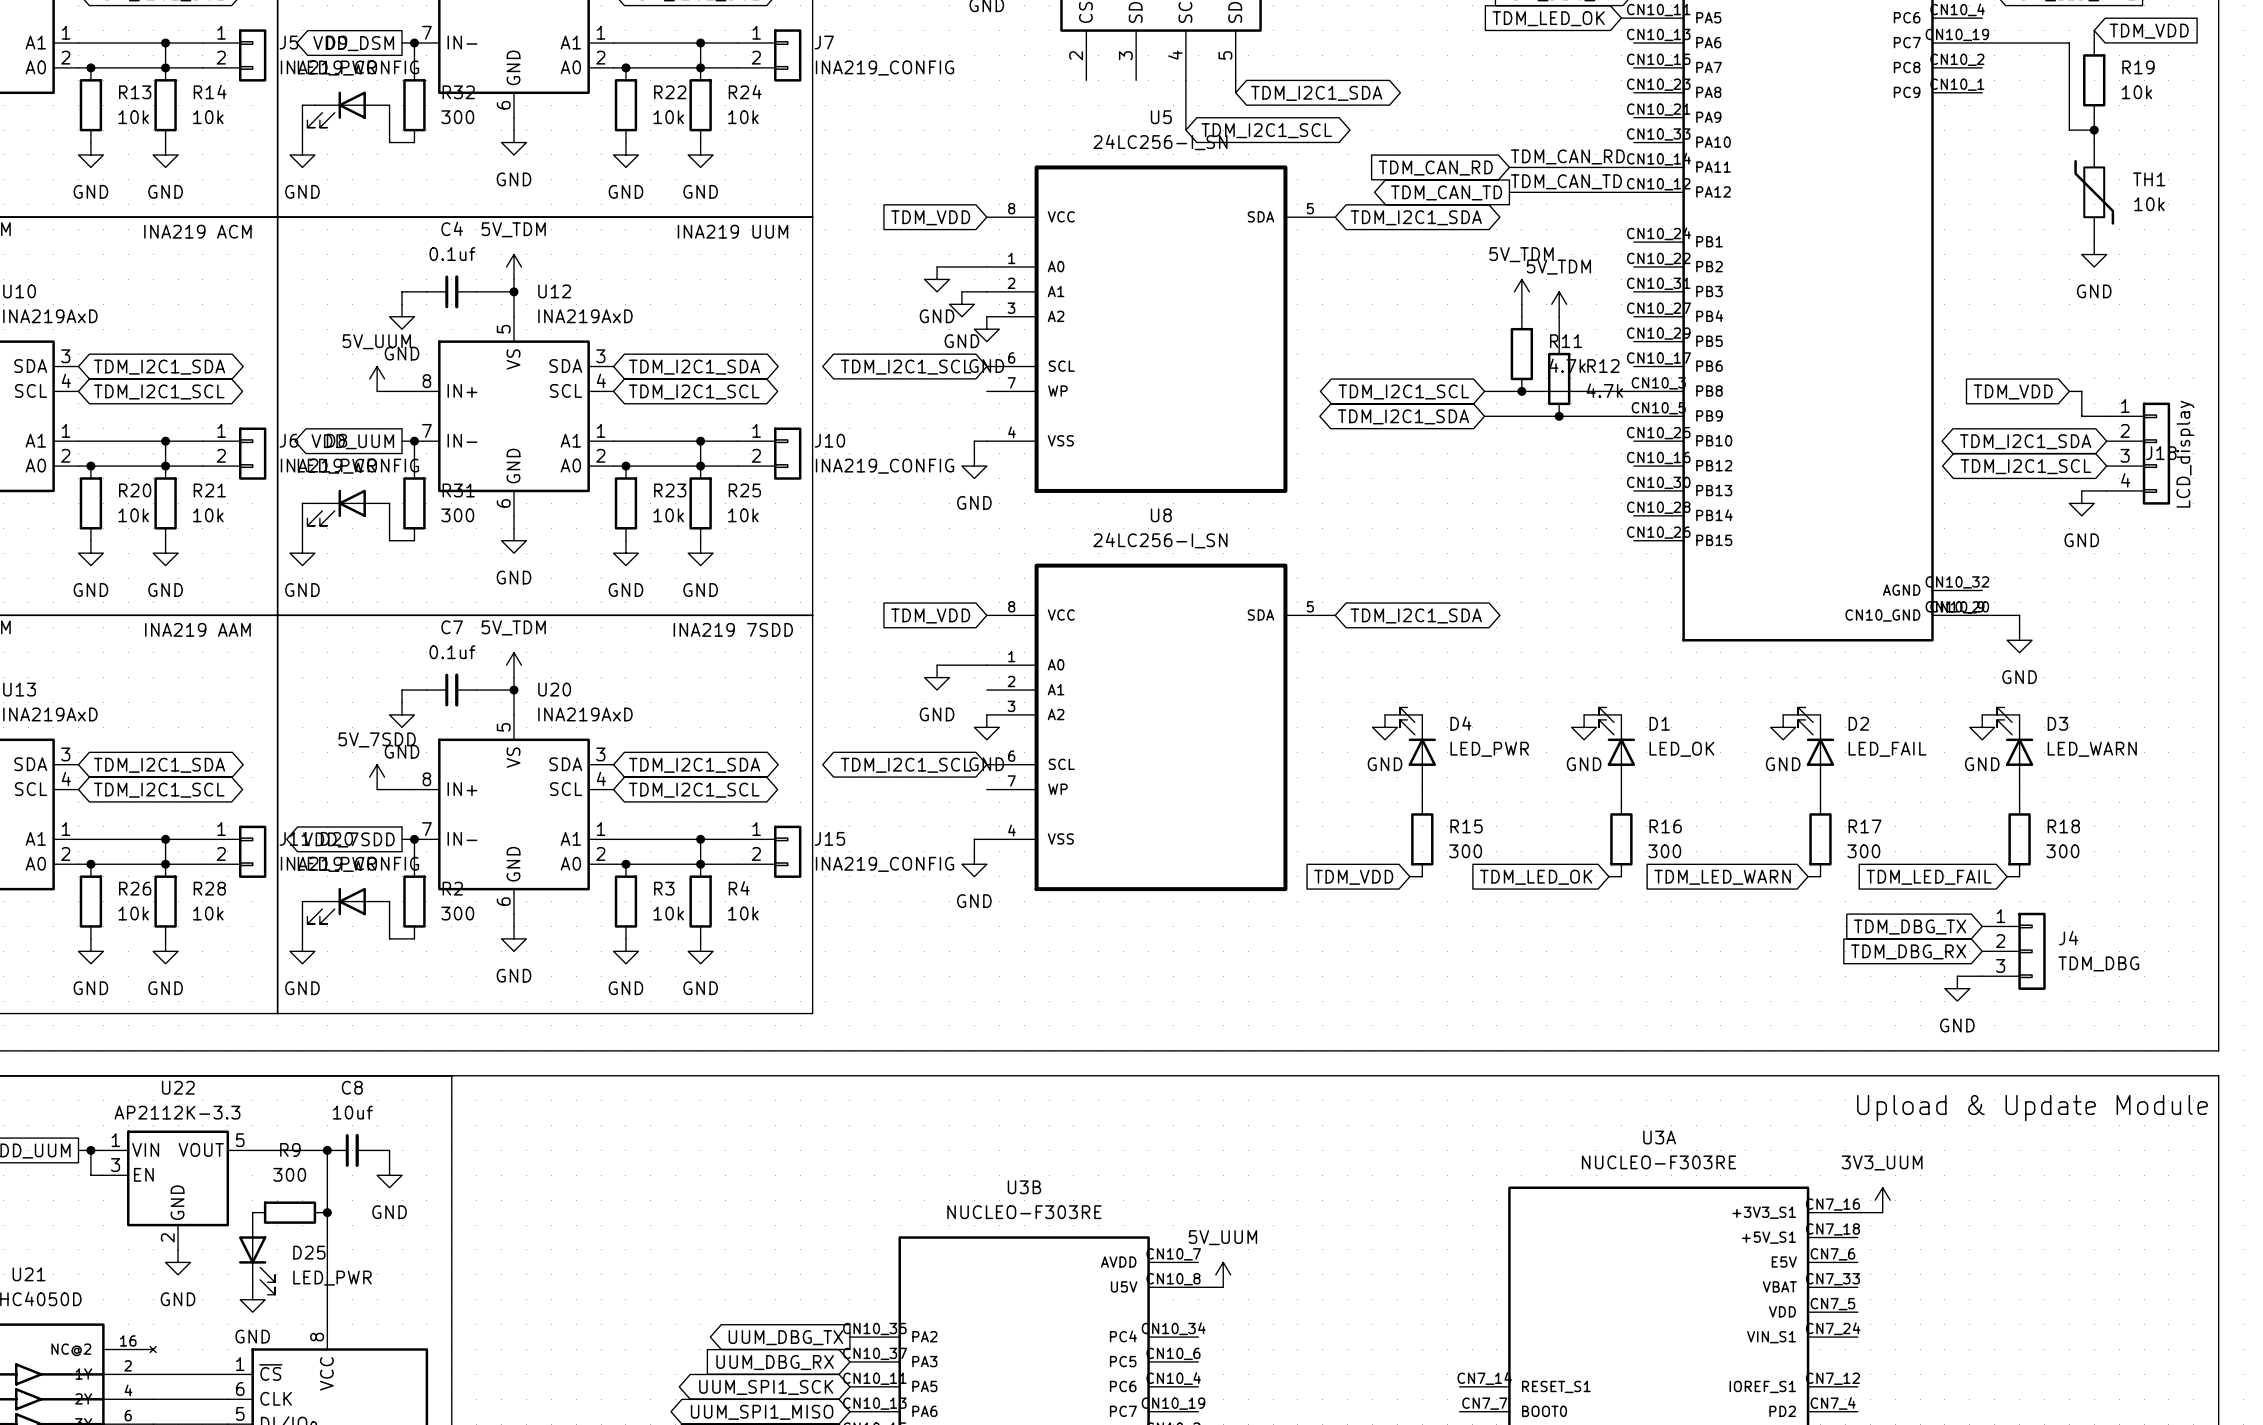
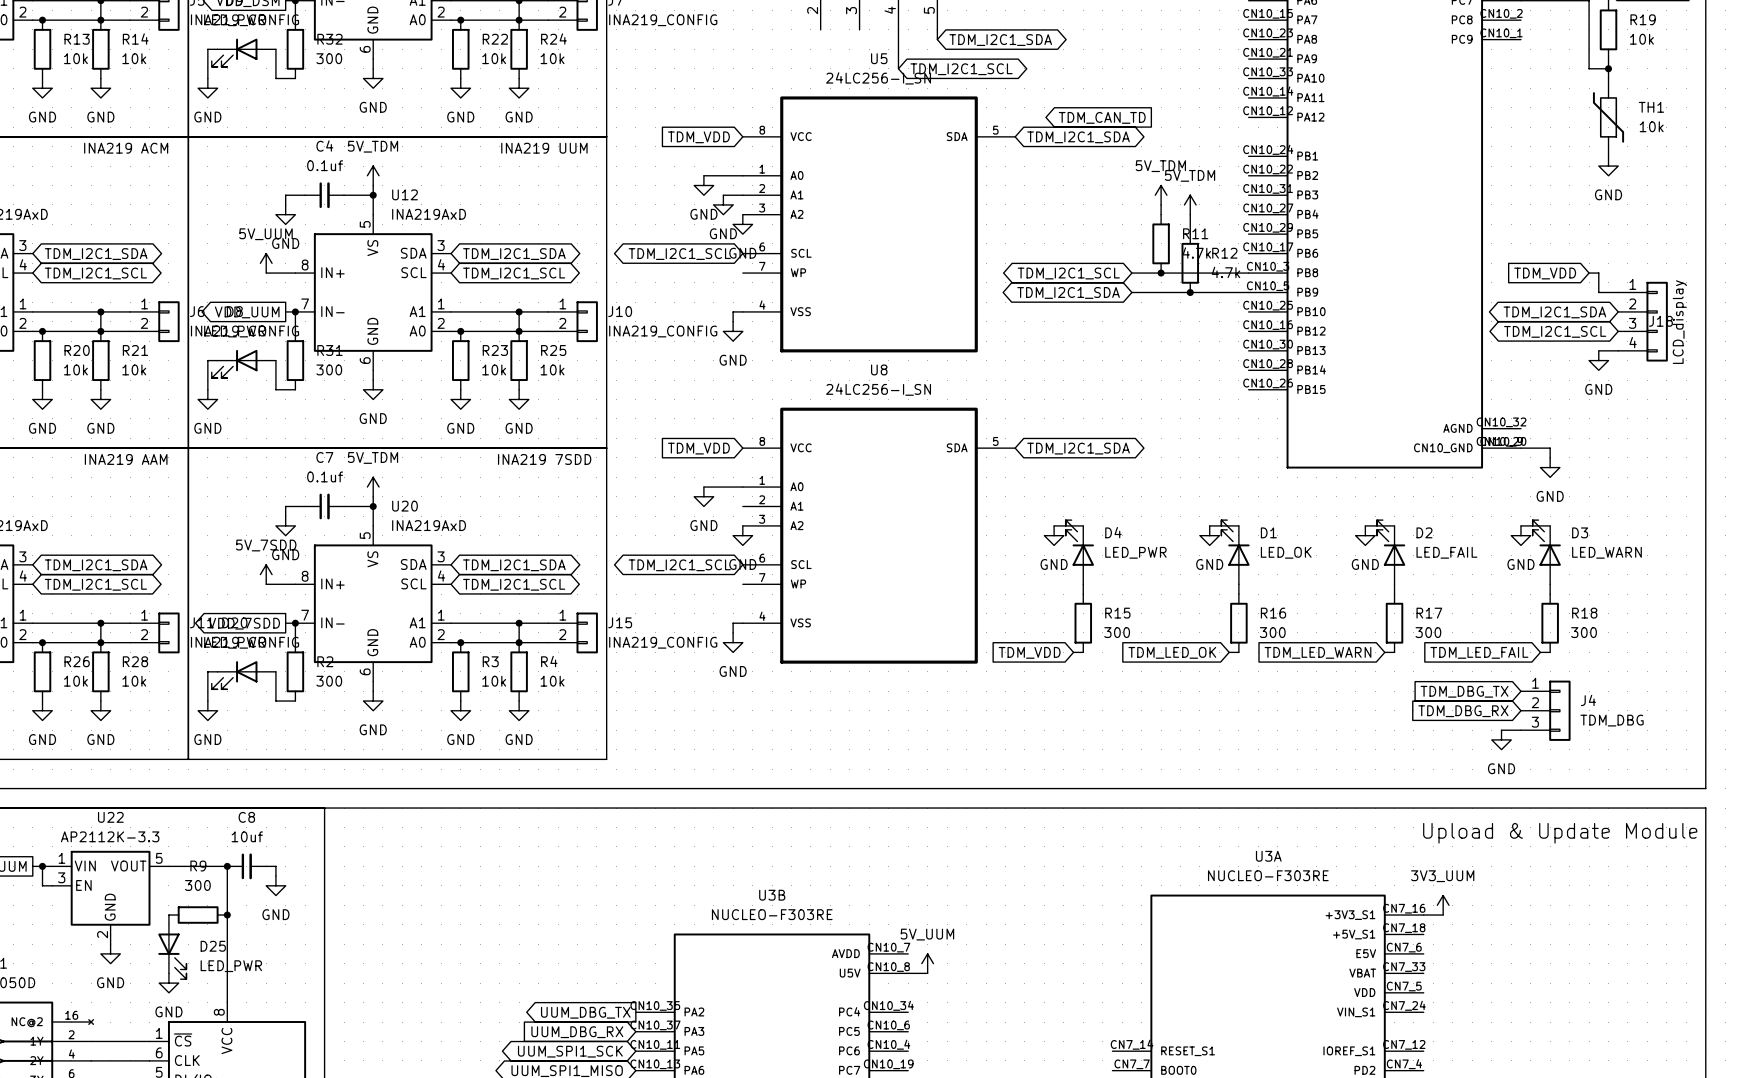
label: TDM_CAN_RD (1567, 156) -> none
wire: (1509, 167) (1633, 167) -> none
global label: TDM_CAN_RD (1435, 168) -> none
label: TDM_CAN_TD (1566, 181) -> none
wire: (1509, 192) (1633, 192) -> none

